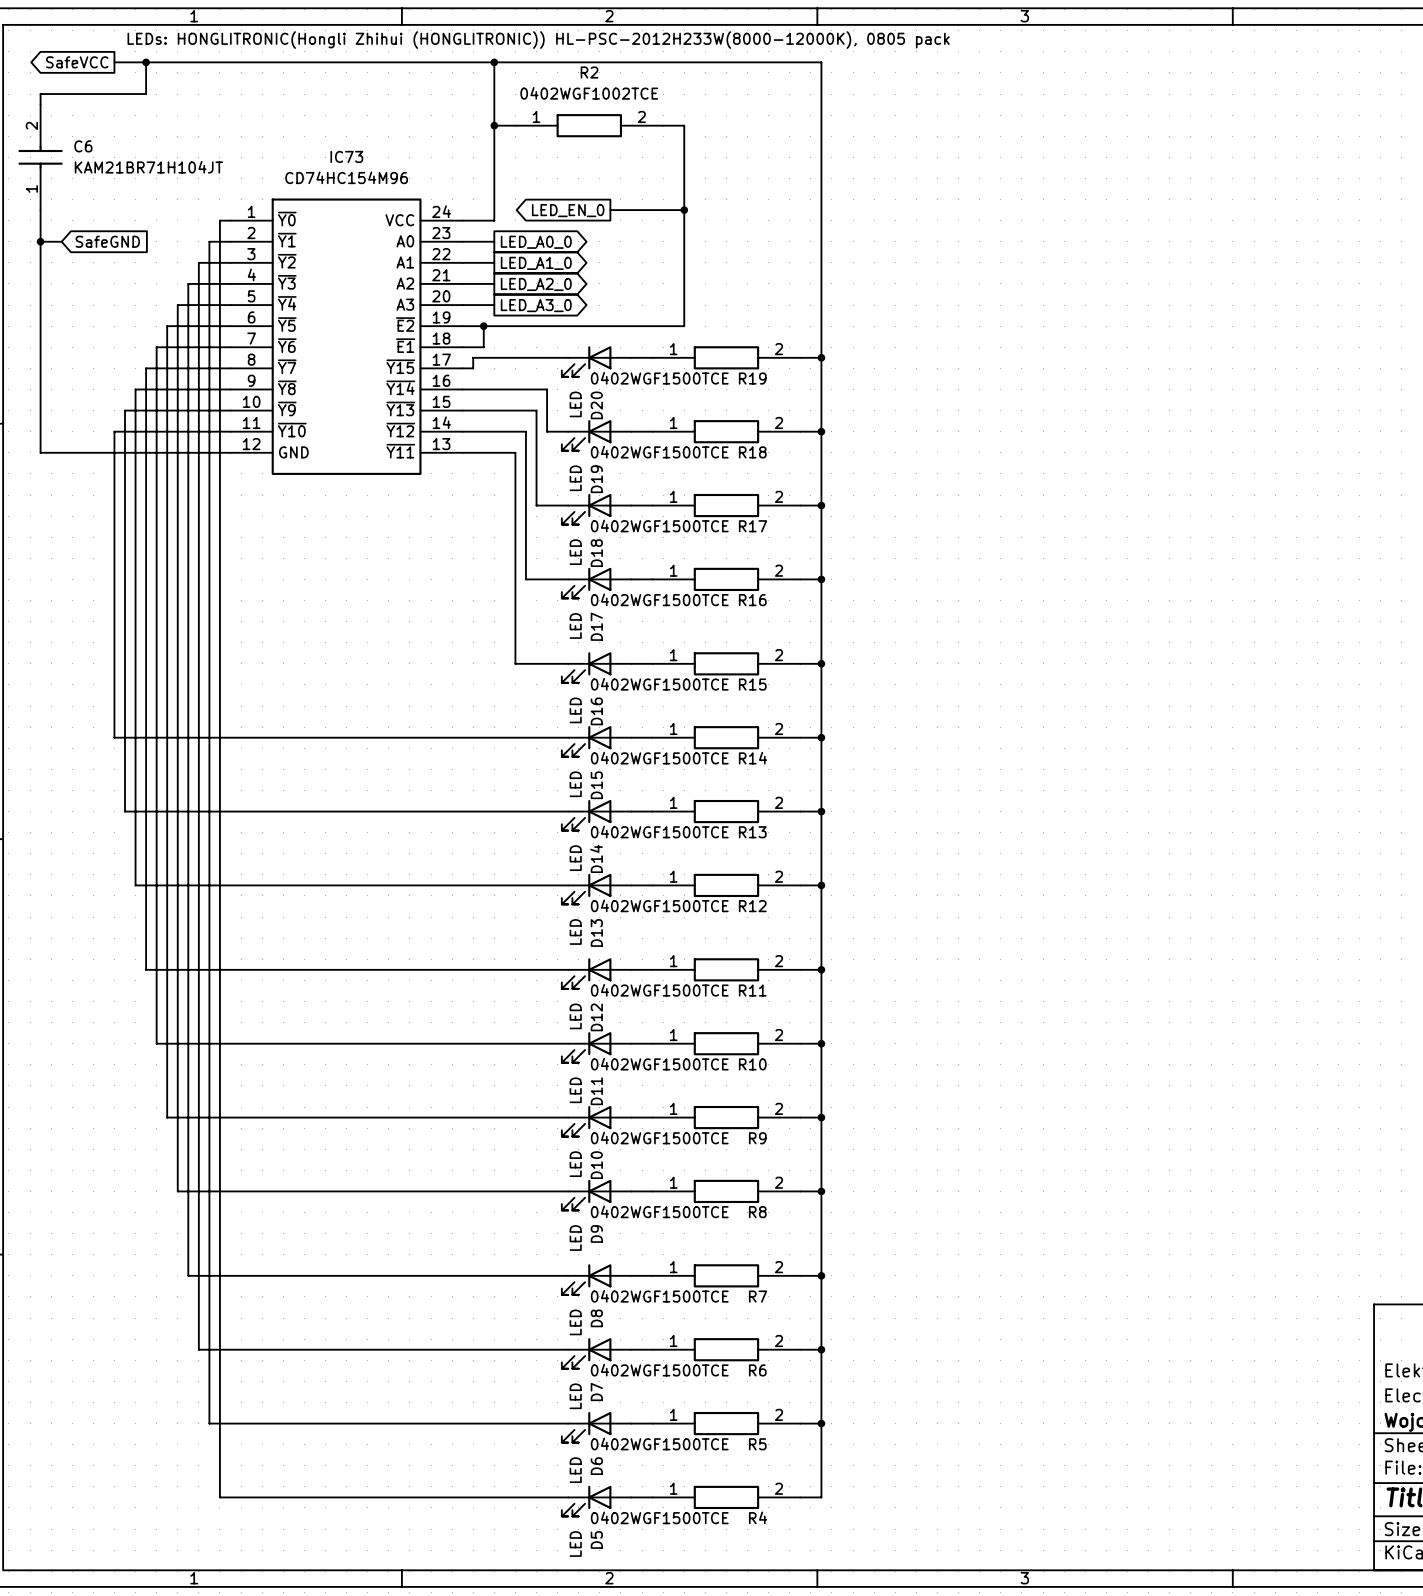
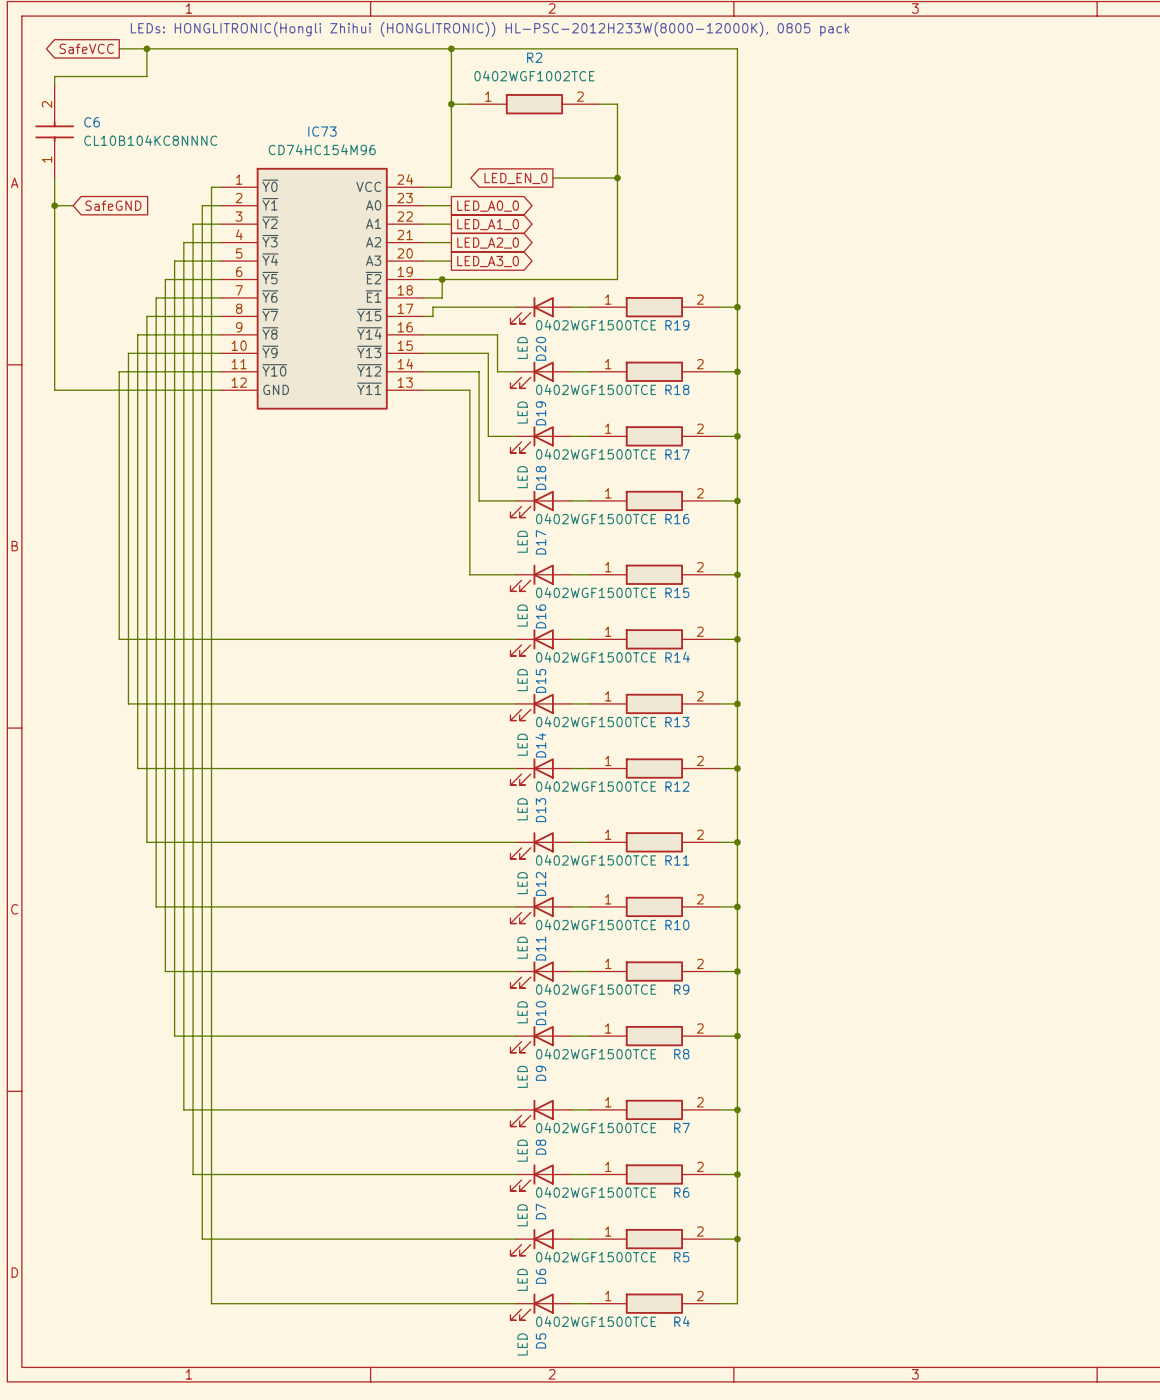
C6 value: KAM21BR71H104JT (148, 167) -> CL10B104KC8NNNC (150, 140)

